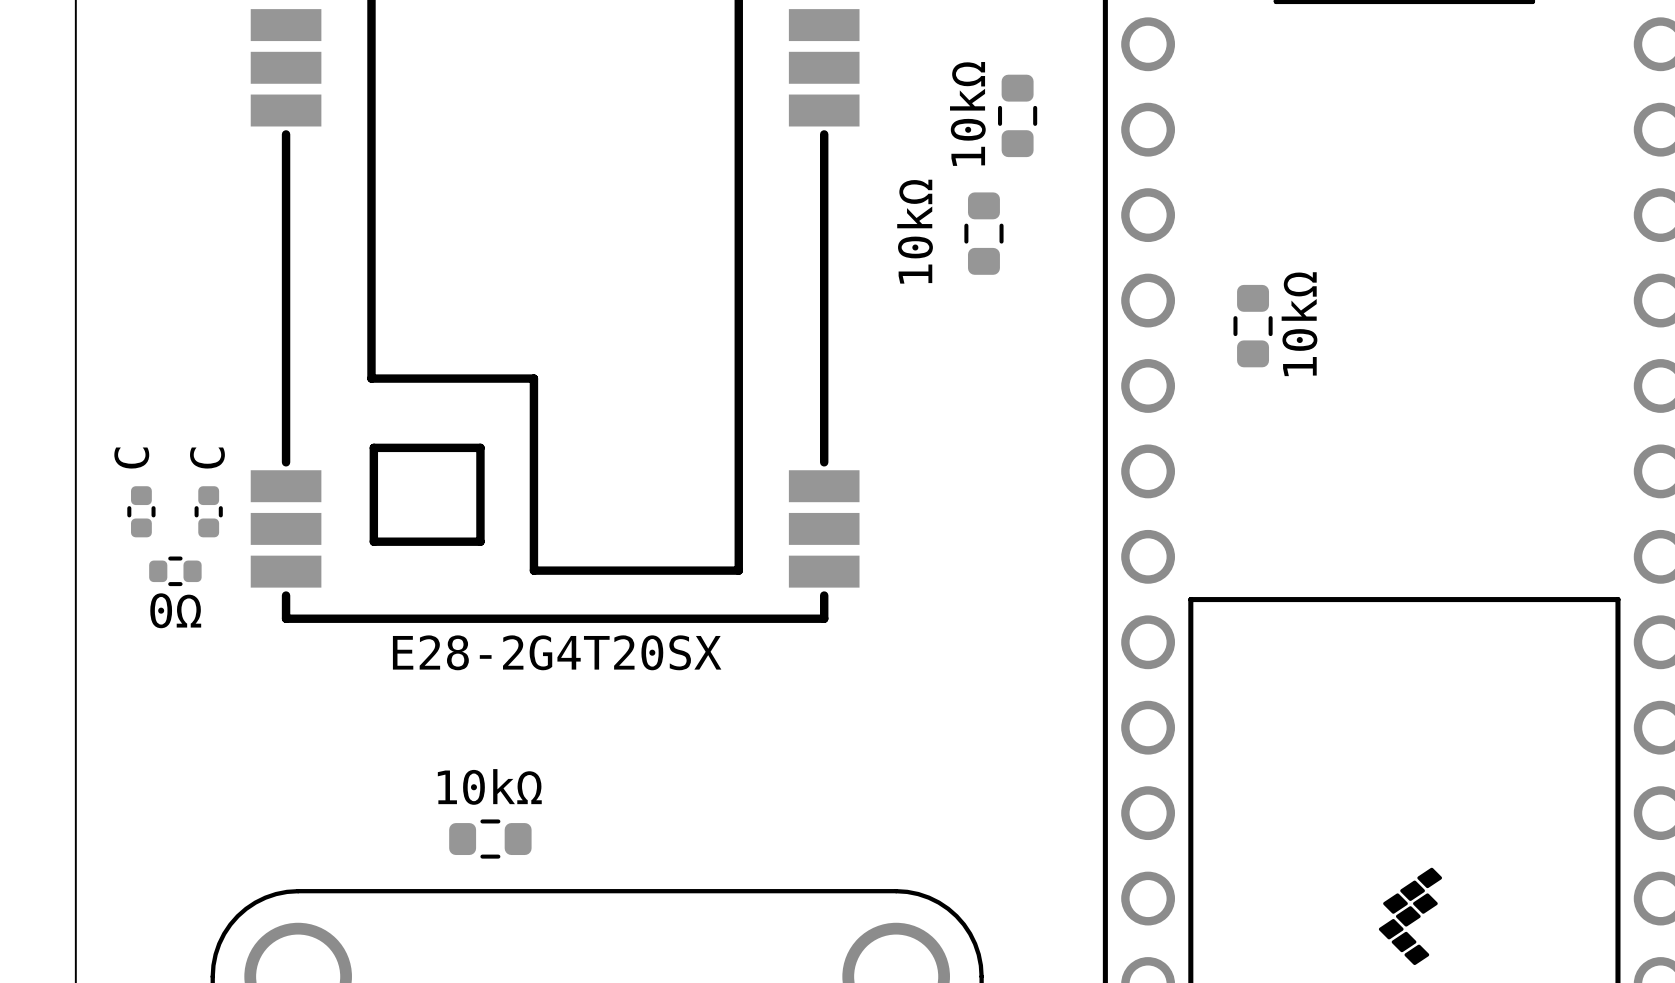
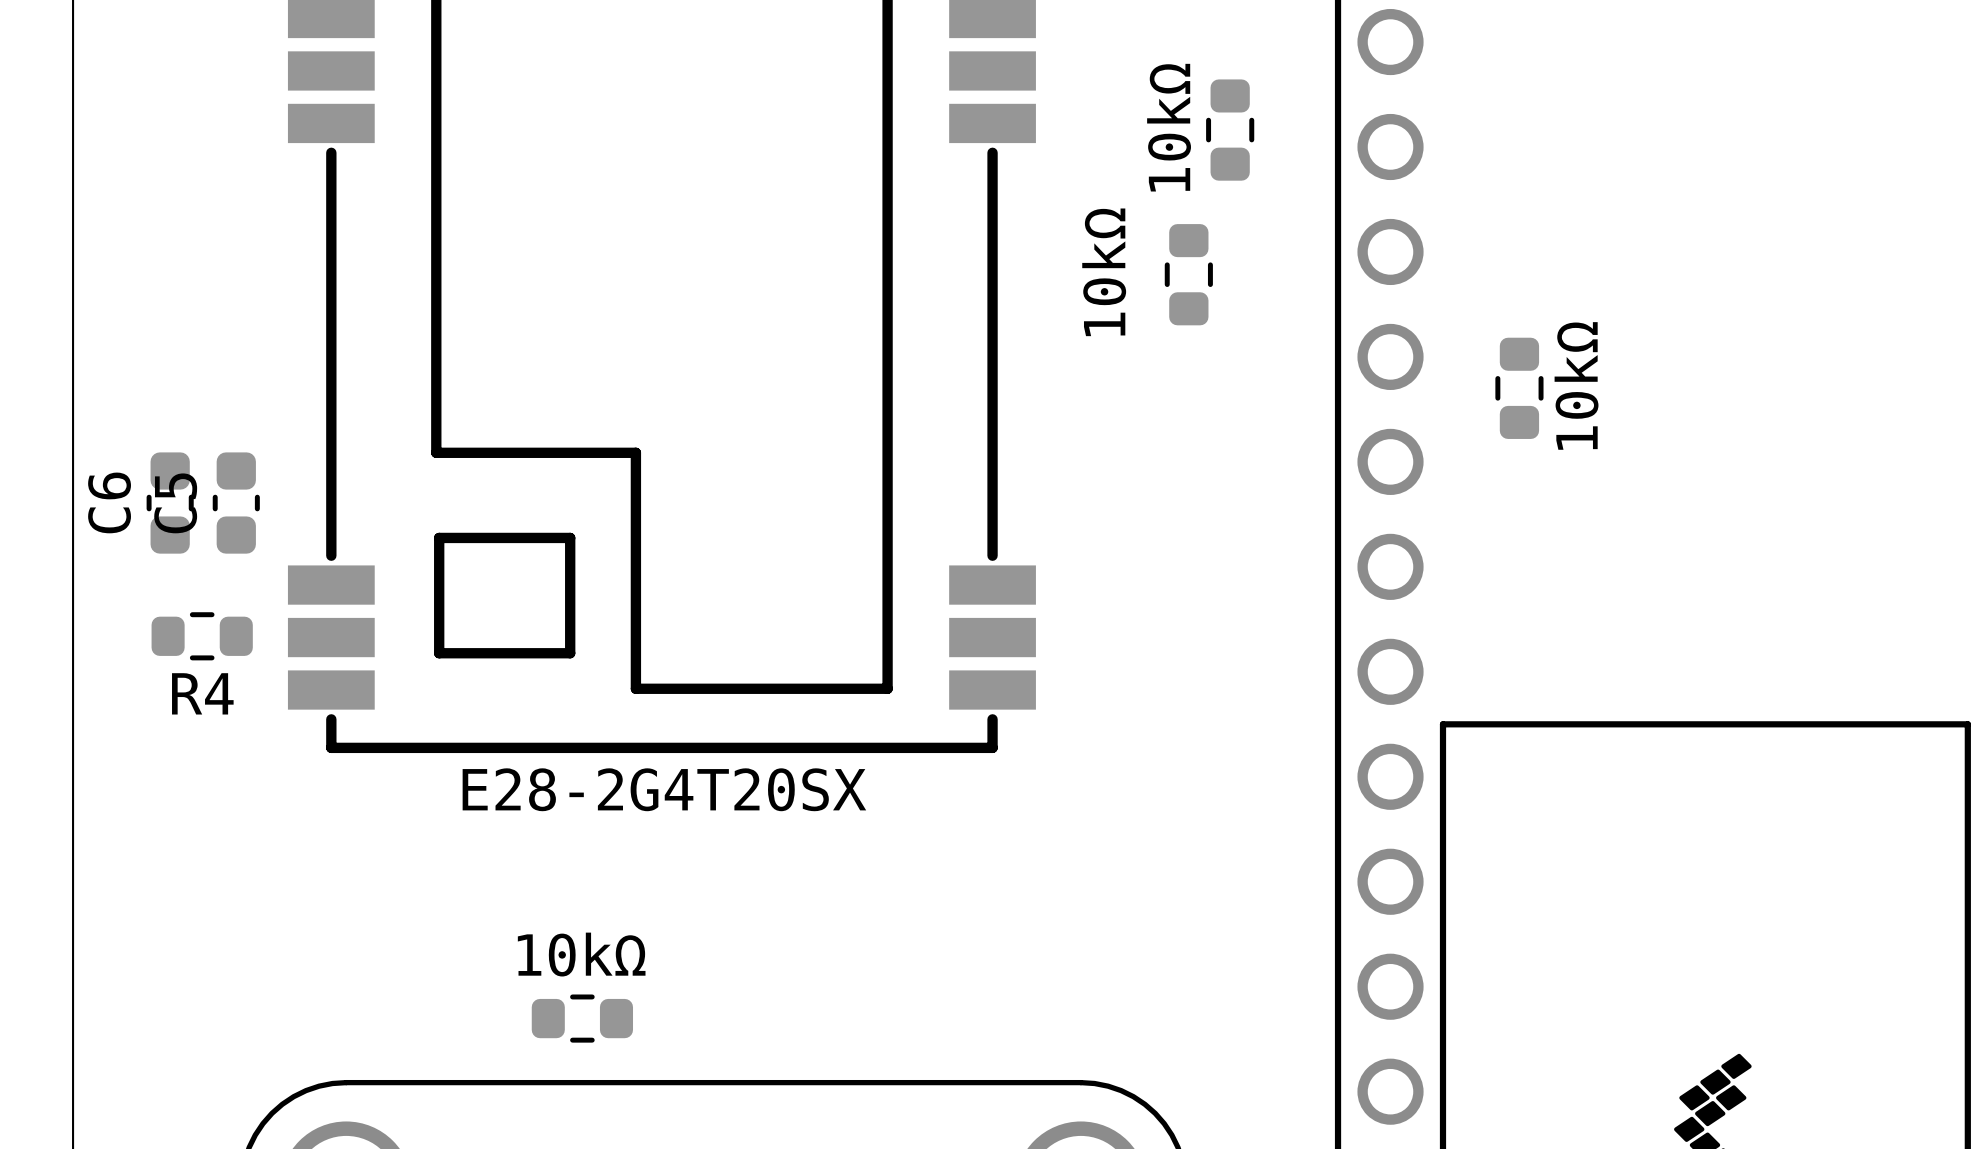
C6: none -> (170, 503)
C5: none -> (236, 503)
part: C (141, 511) -> none
part: C (208, 511) -> none
R4: none -> (202, 636)
part: 0Ω (175, 571) -> none

